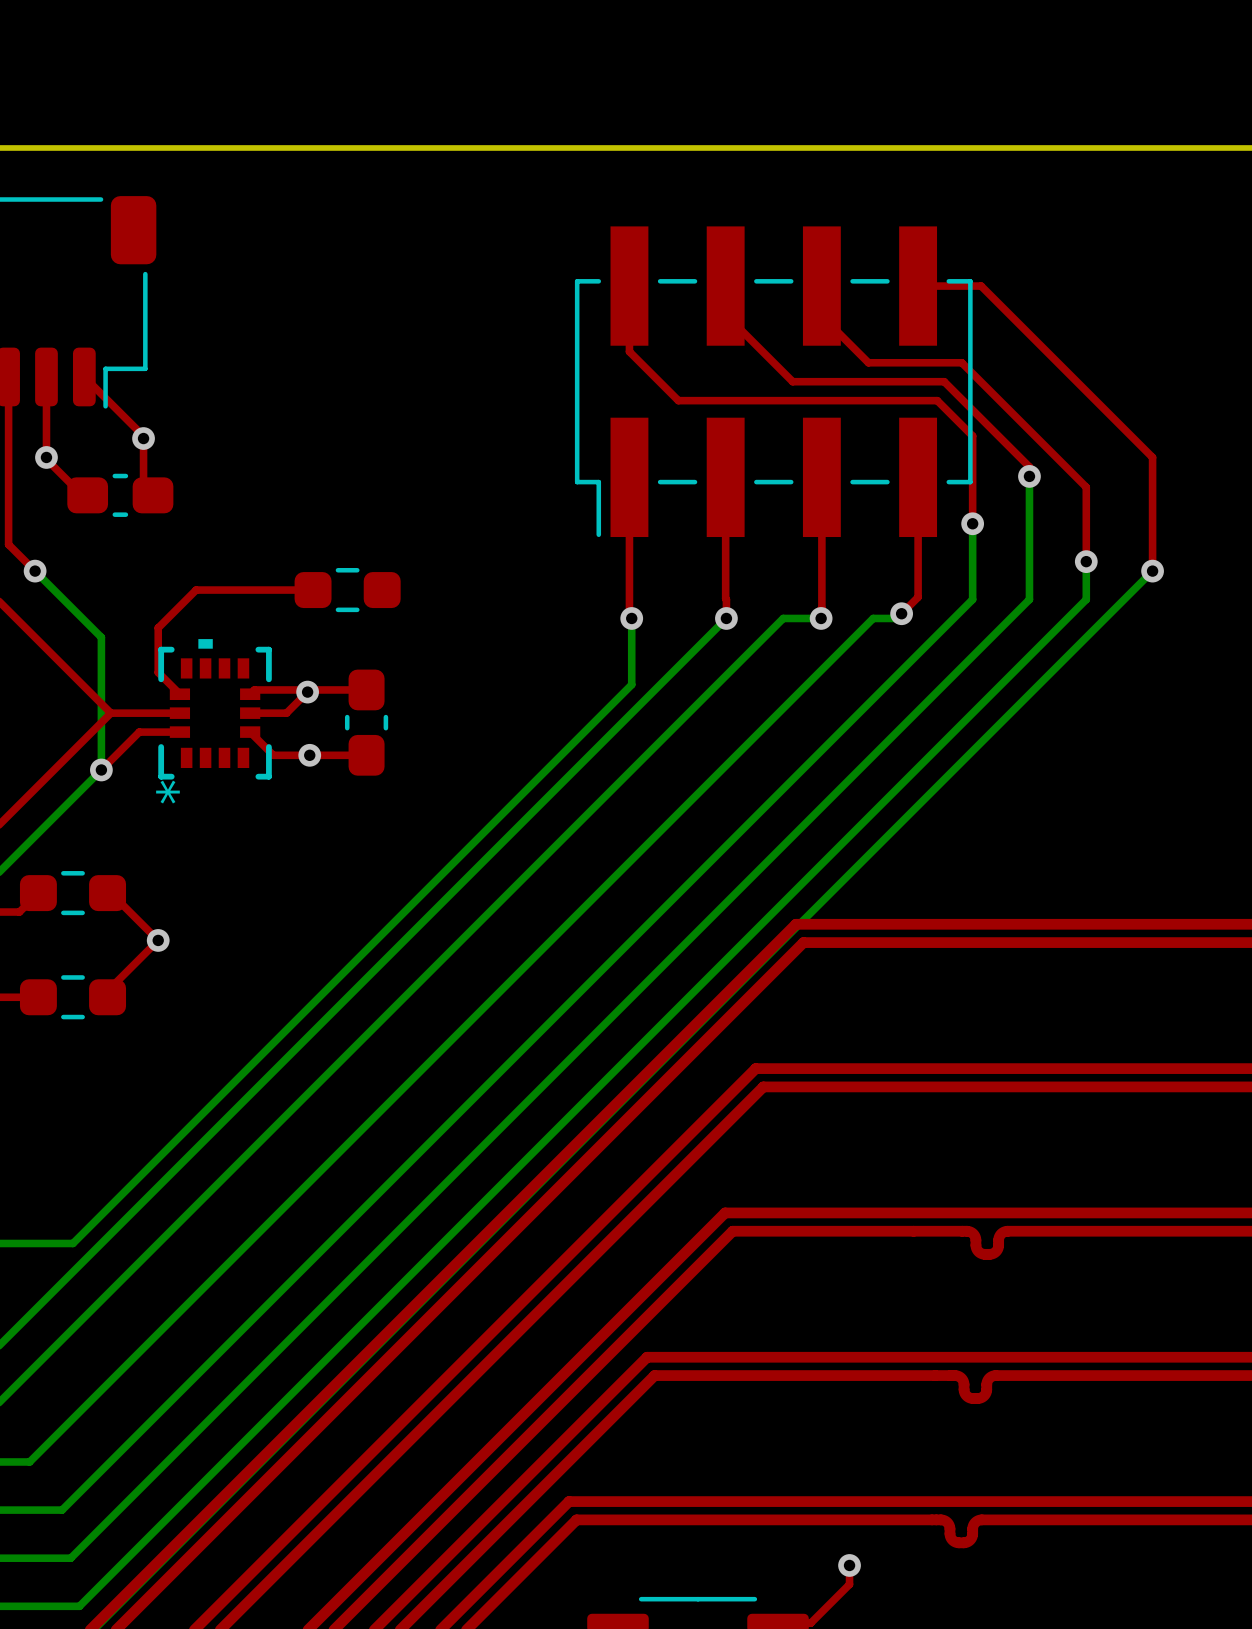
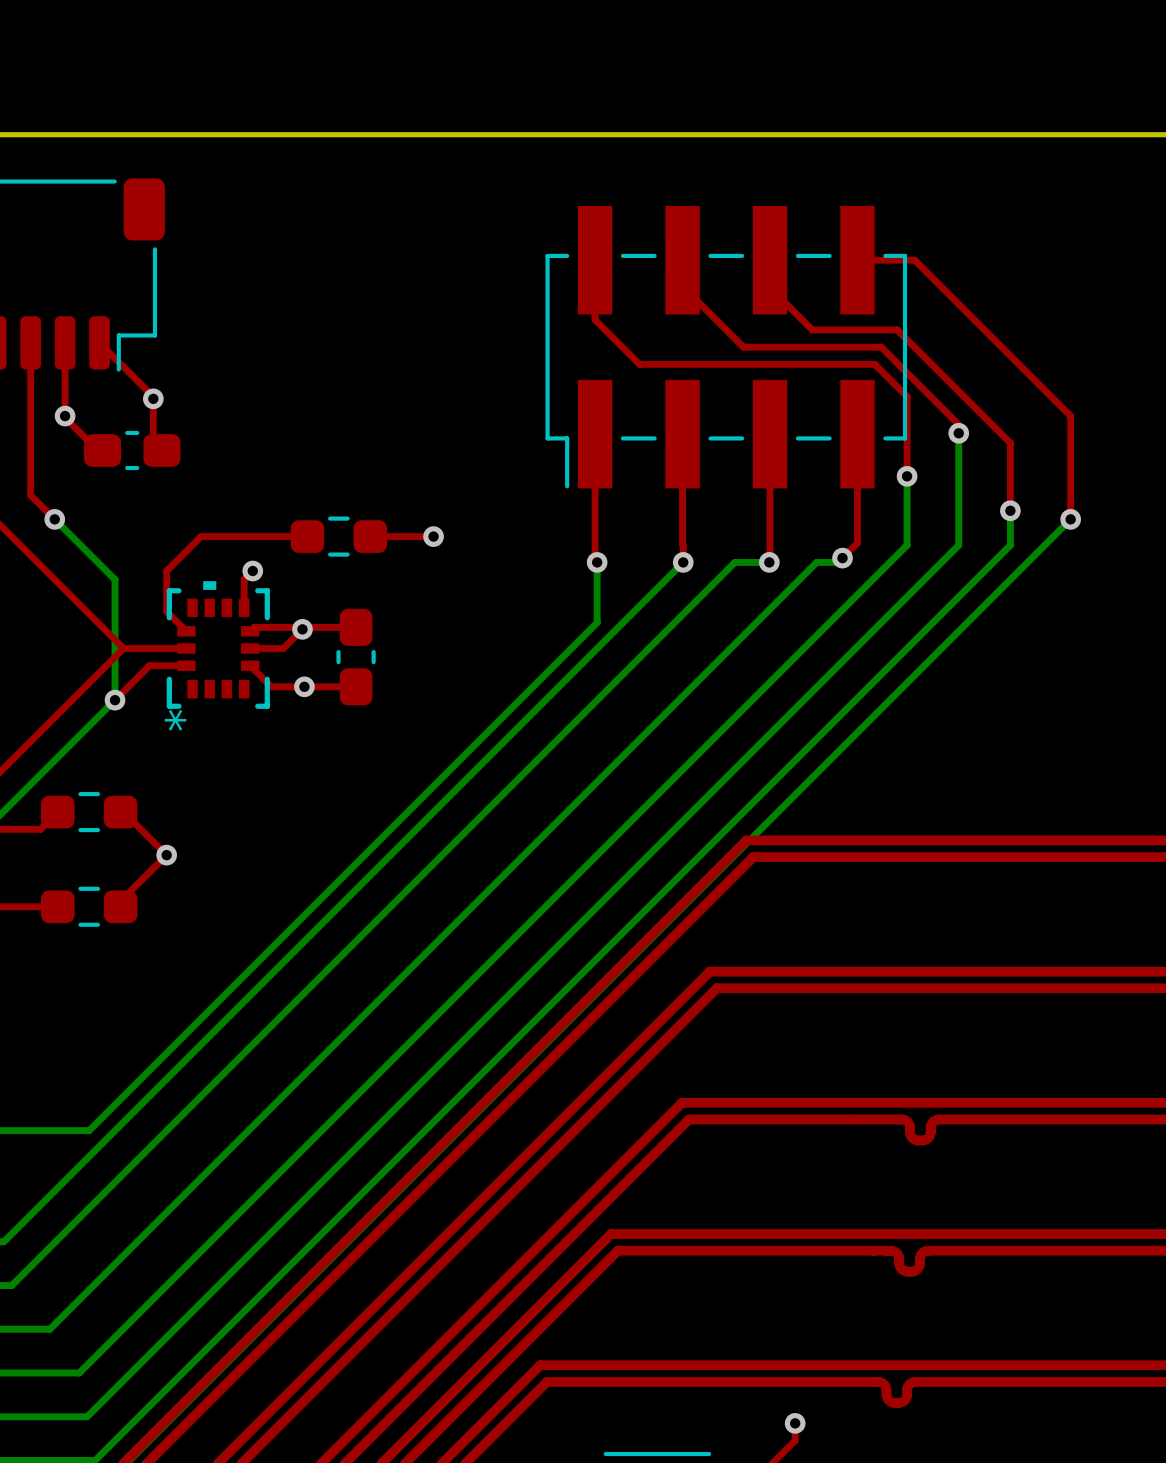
top track: none -> (370, 536) (433, 536)
via: none -> (433, 536)
top track: none -> (252, 571) (244, 579) (244, 607)
via: none -> (252, 571)

